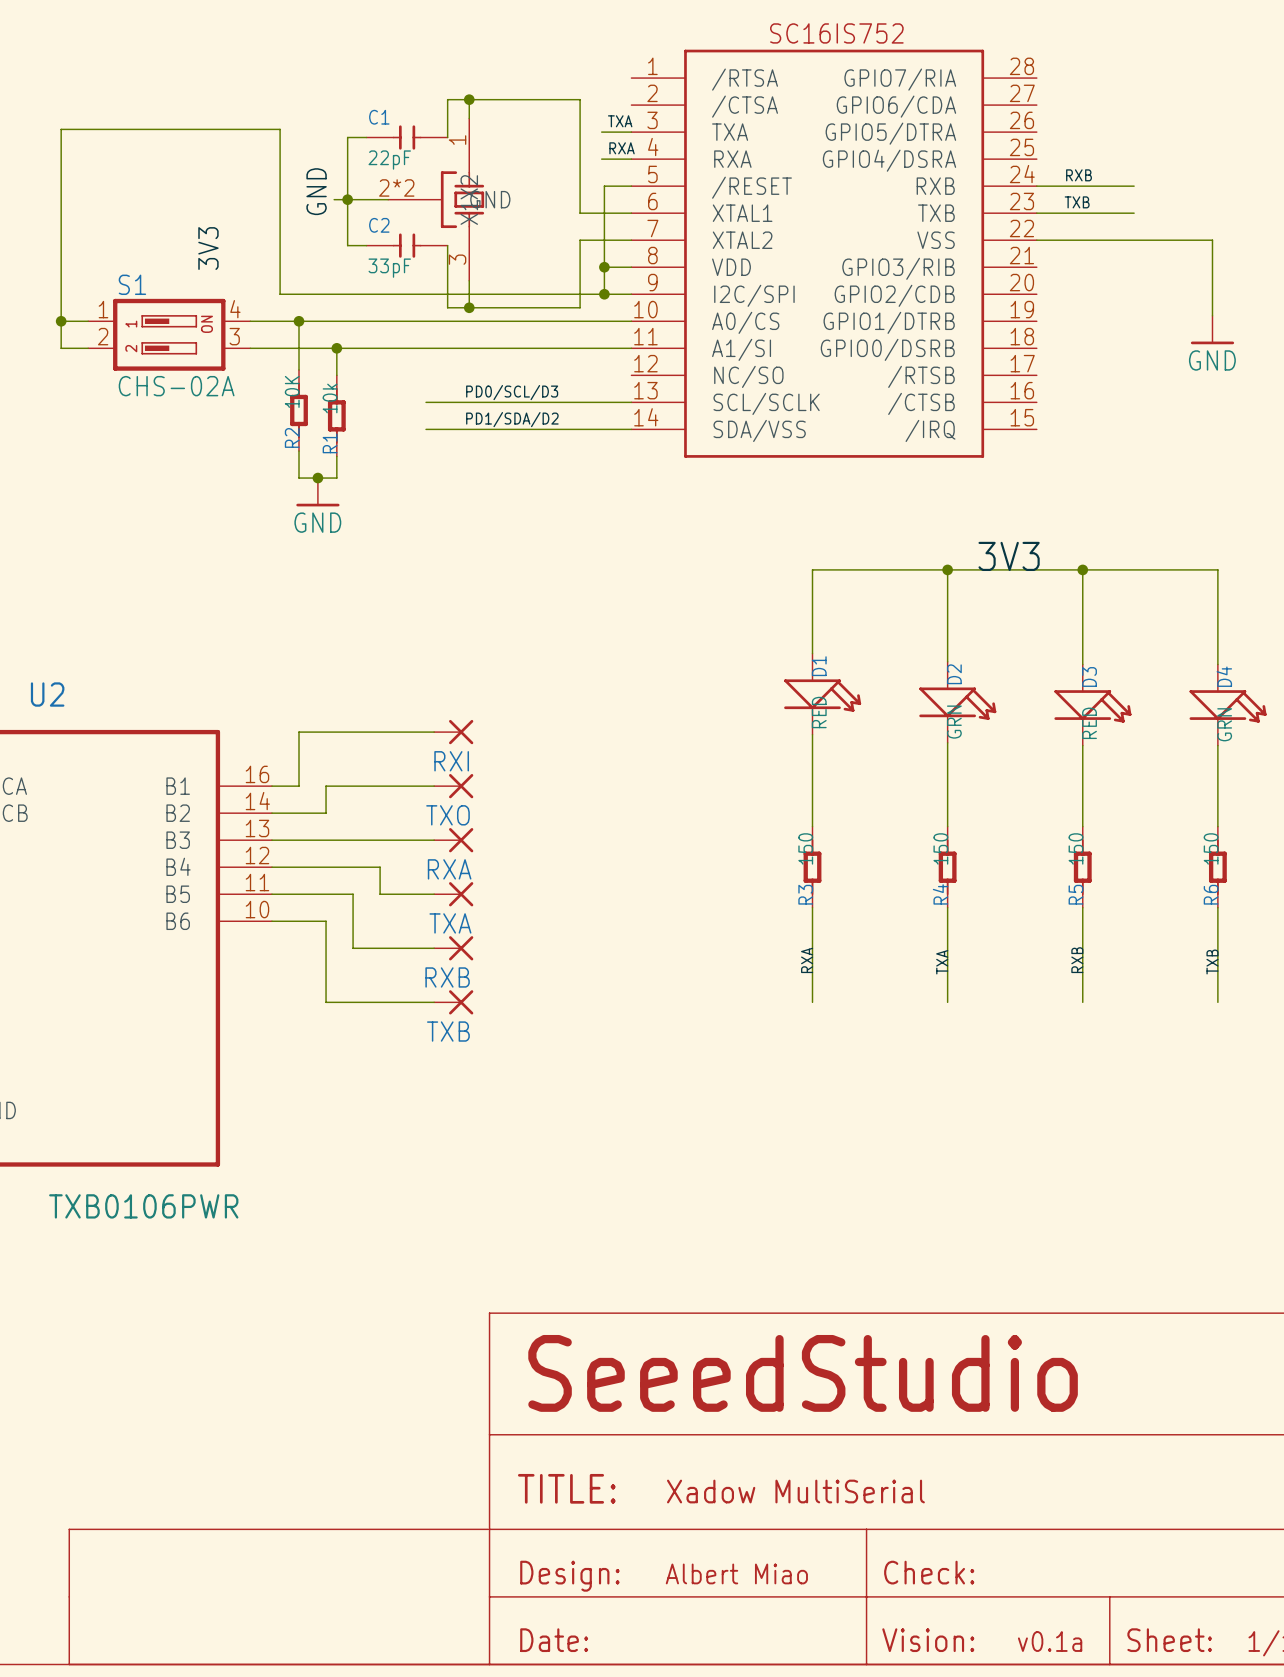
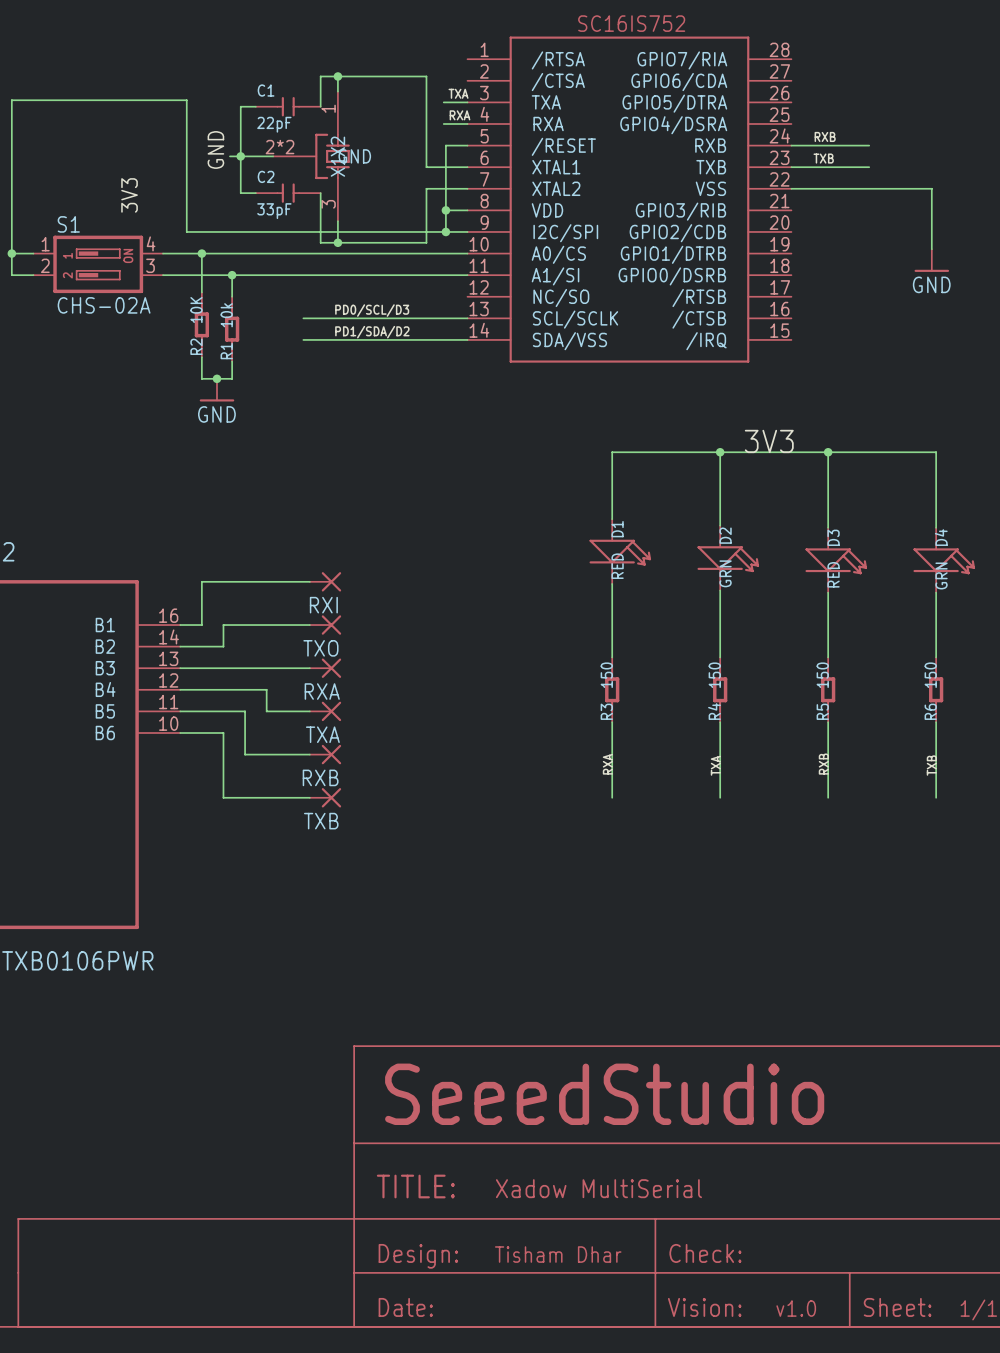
text: Albert Miao (736, 1573) -> Tisham Dhar (558, 1254)
text: v0.1a (1050, 1641) -> v1.0 (796, 1308)

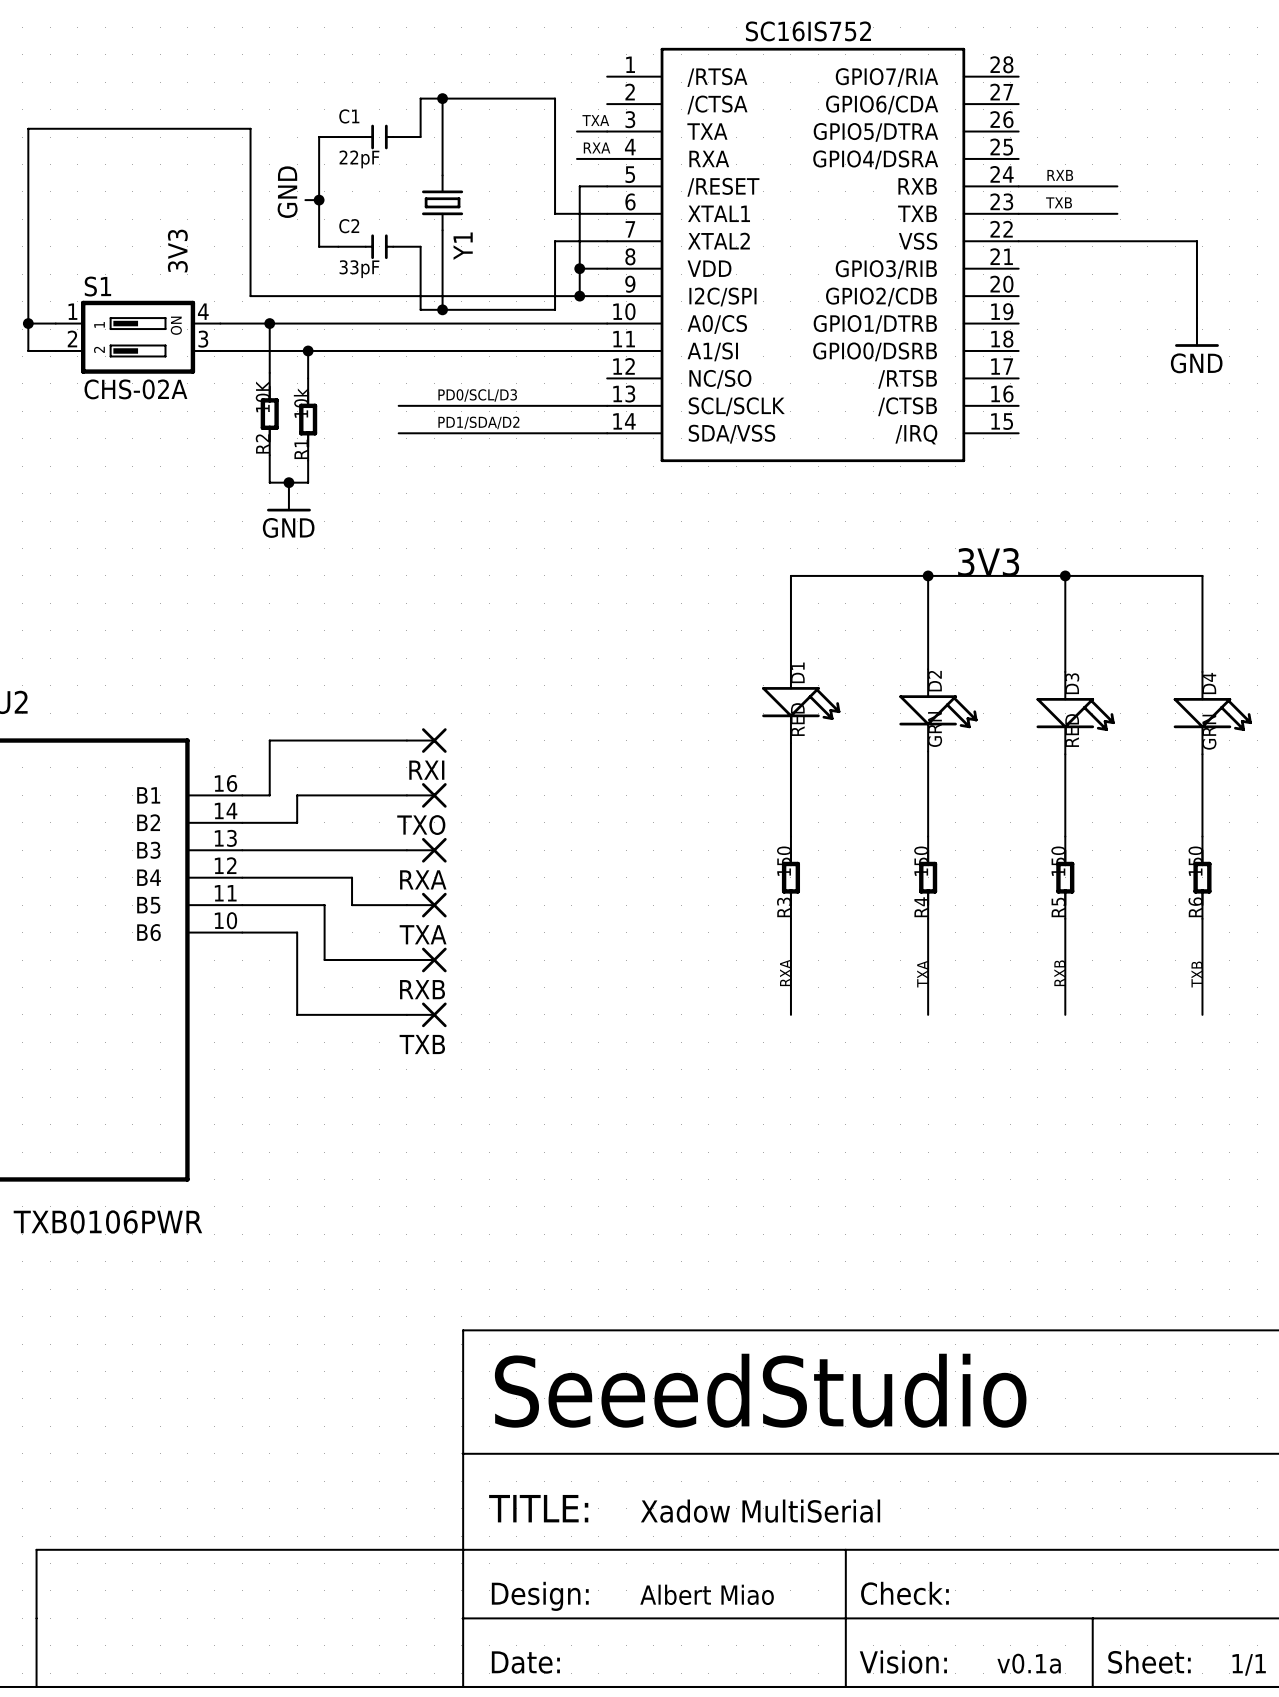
wire: (240, 156) (273, 156) -> none
part: (311, 156) -> none
Y1: none -> (442, 202)
text: Tisham Dhar (558, 1254) -> Albert Miao (707, 1594)
text: v1.0 (796, 1308) -> v0.1a (1029, 1663)

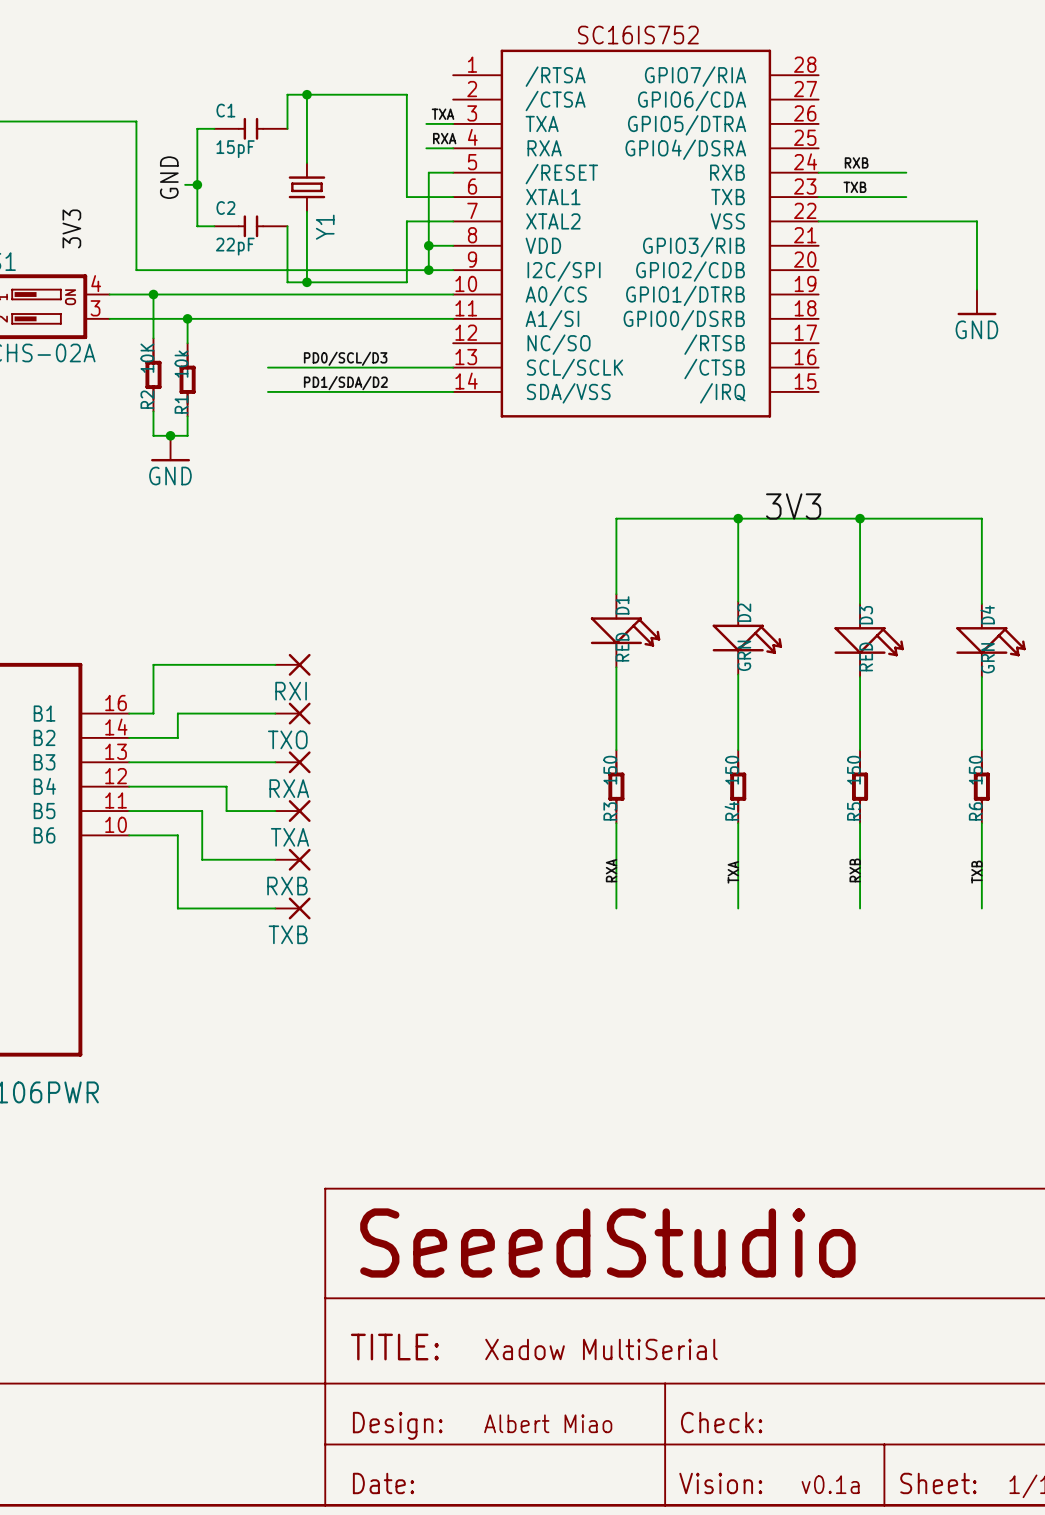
C1 value: 22pF (359, 159) -> 15pF (235, 149)
C2 value: 33pF (359, 269) -> 22pF (235, 246)

